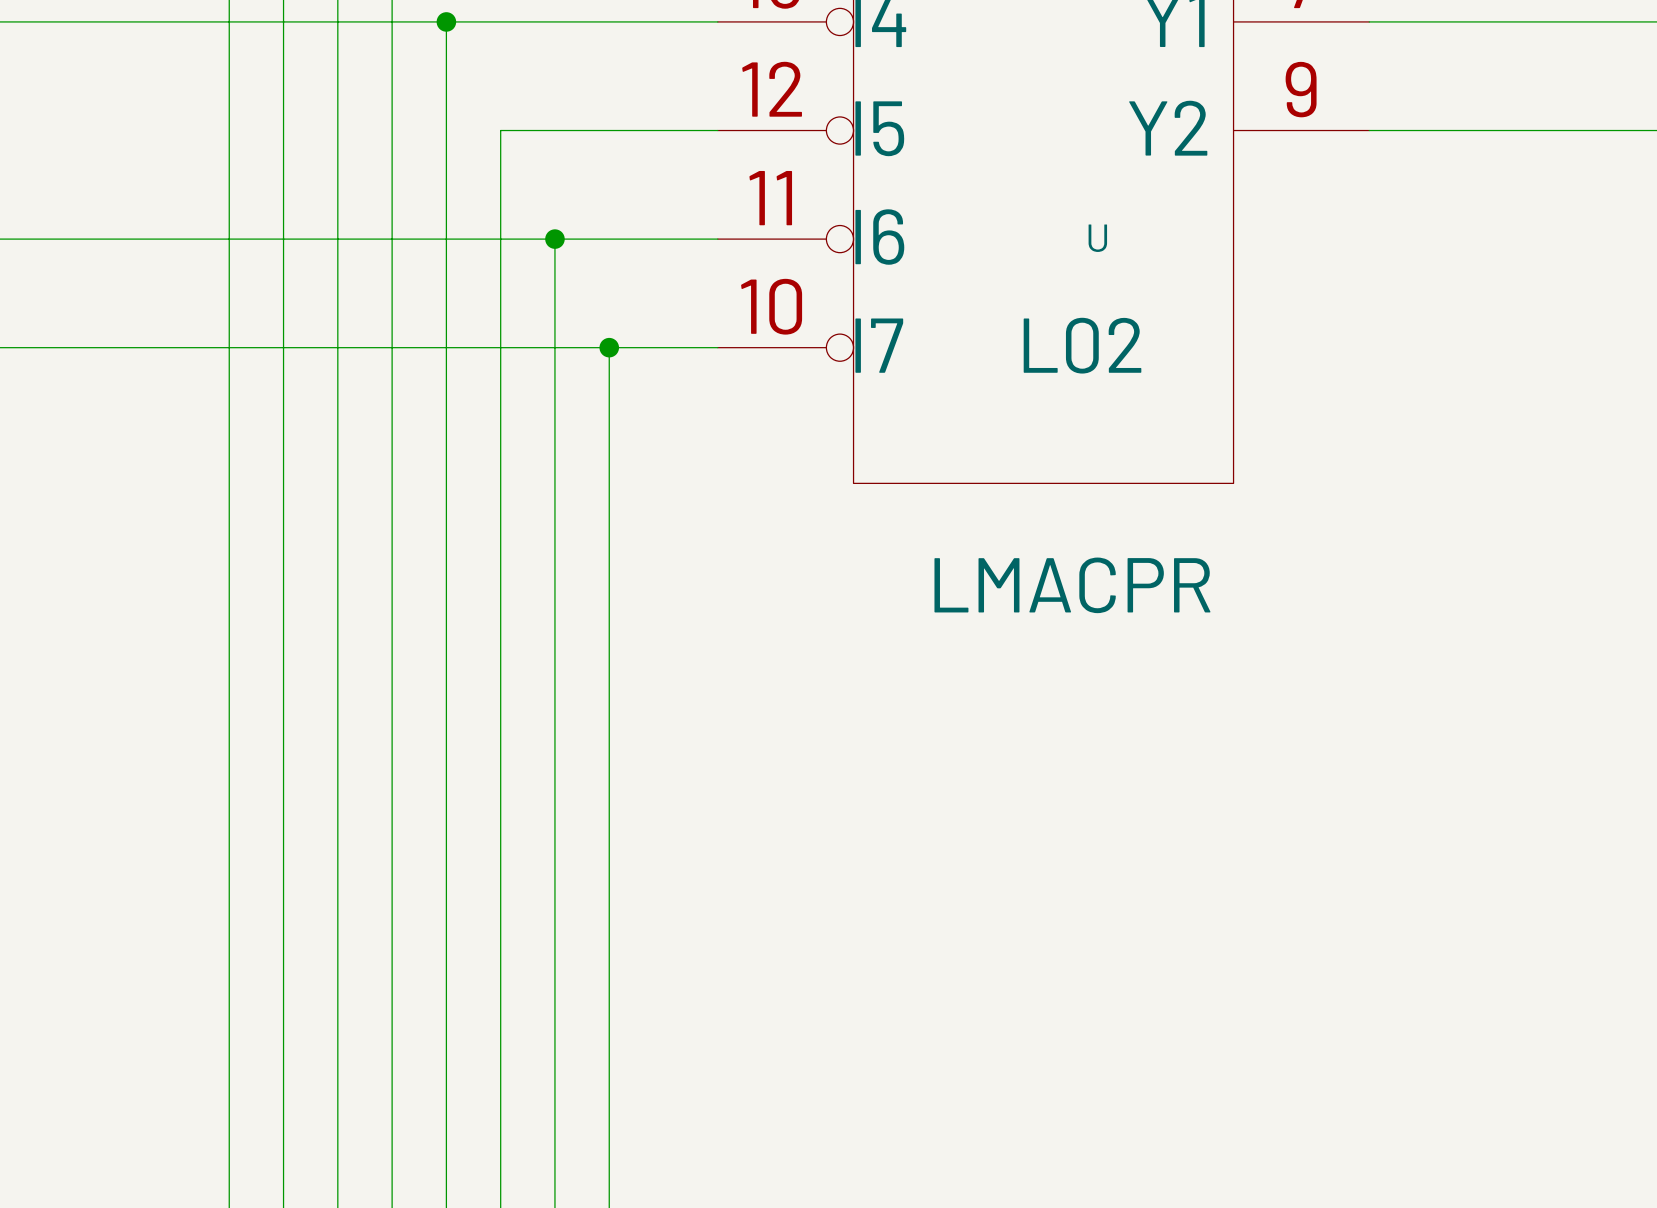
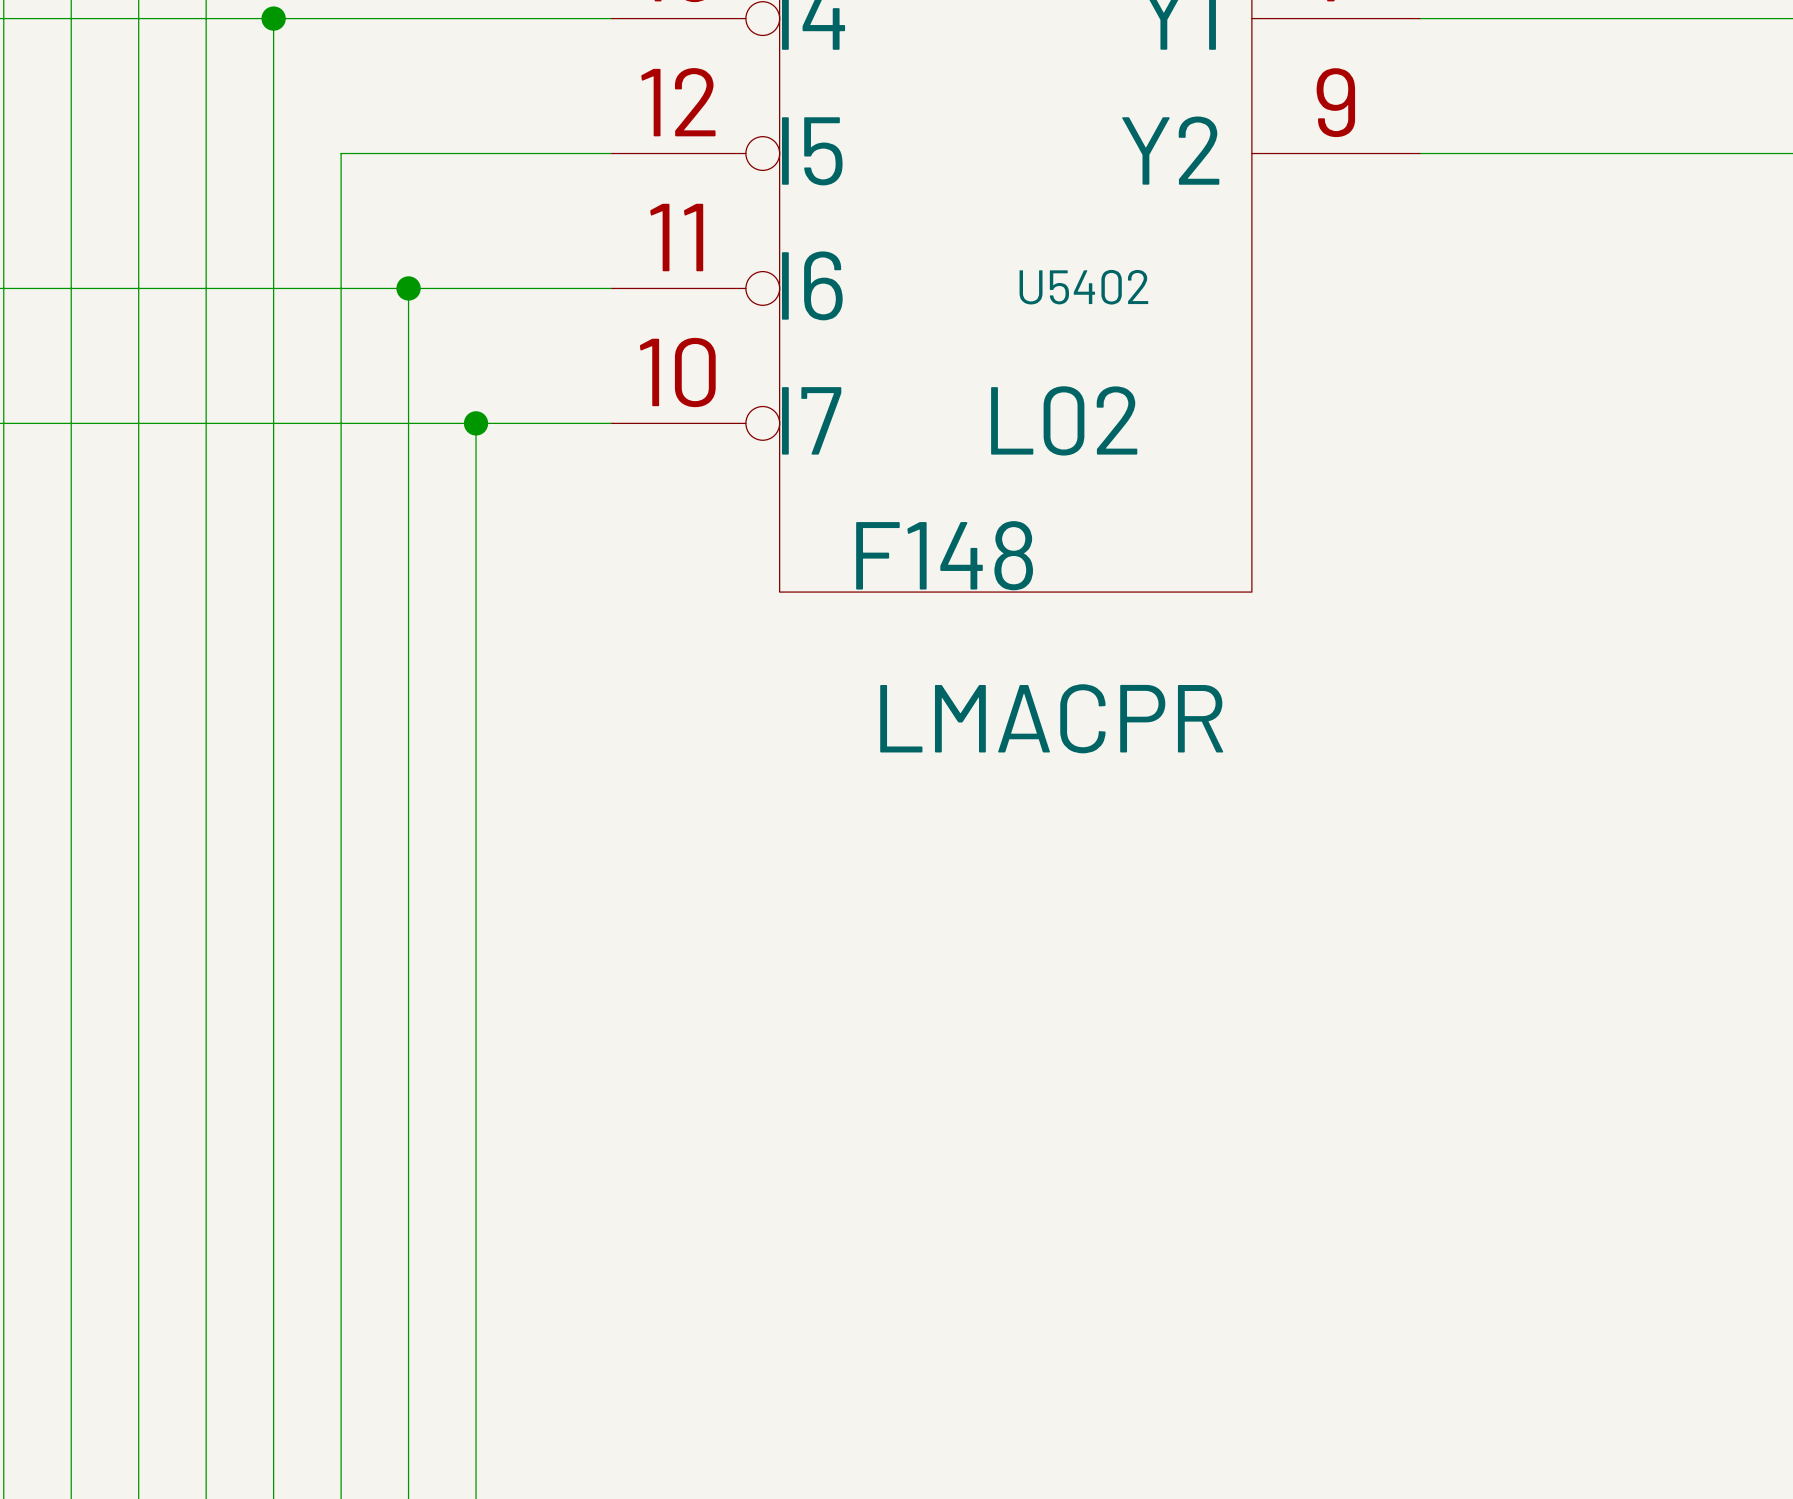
U name: U (1097, 238) -> U5402 (1083, 287)
U value: none -> F148 (944, 555)

